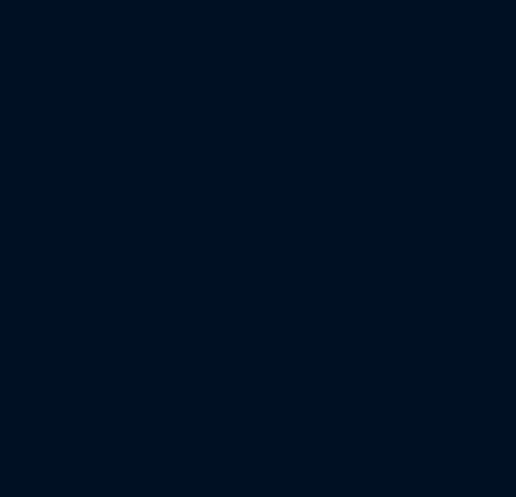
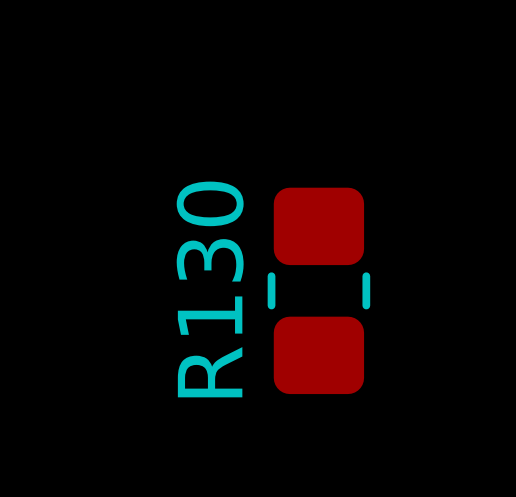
R130: none -> (318, 290)

